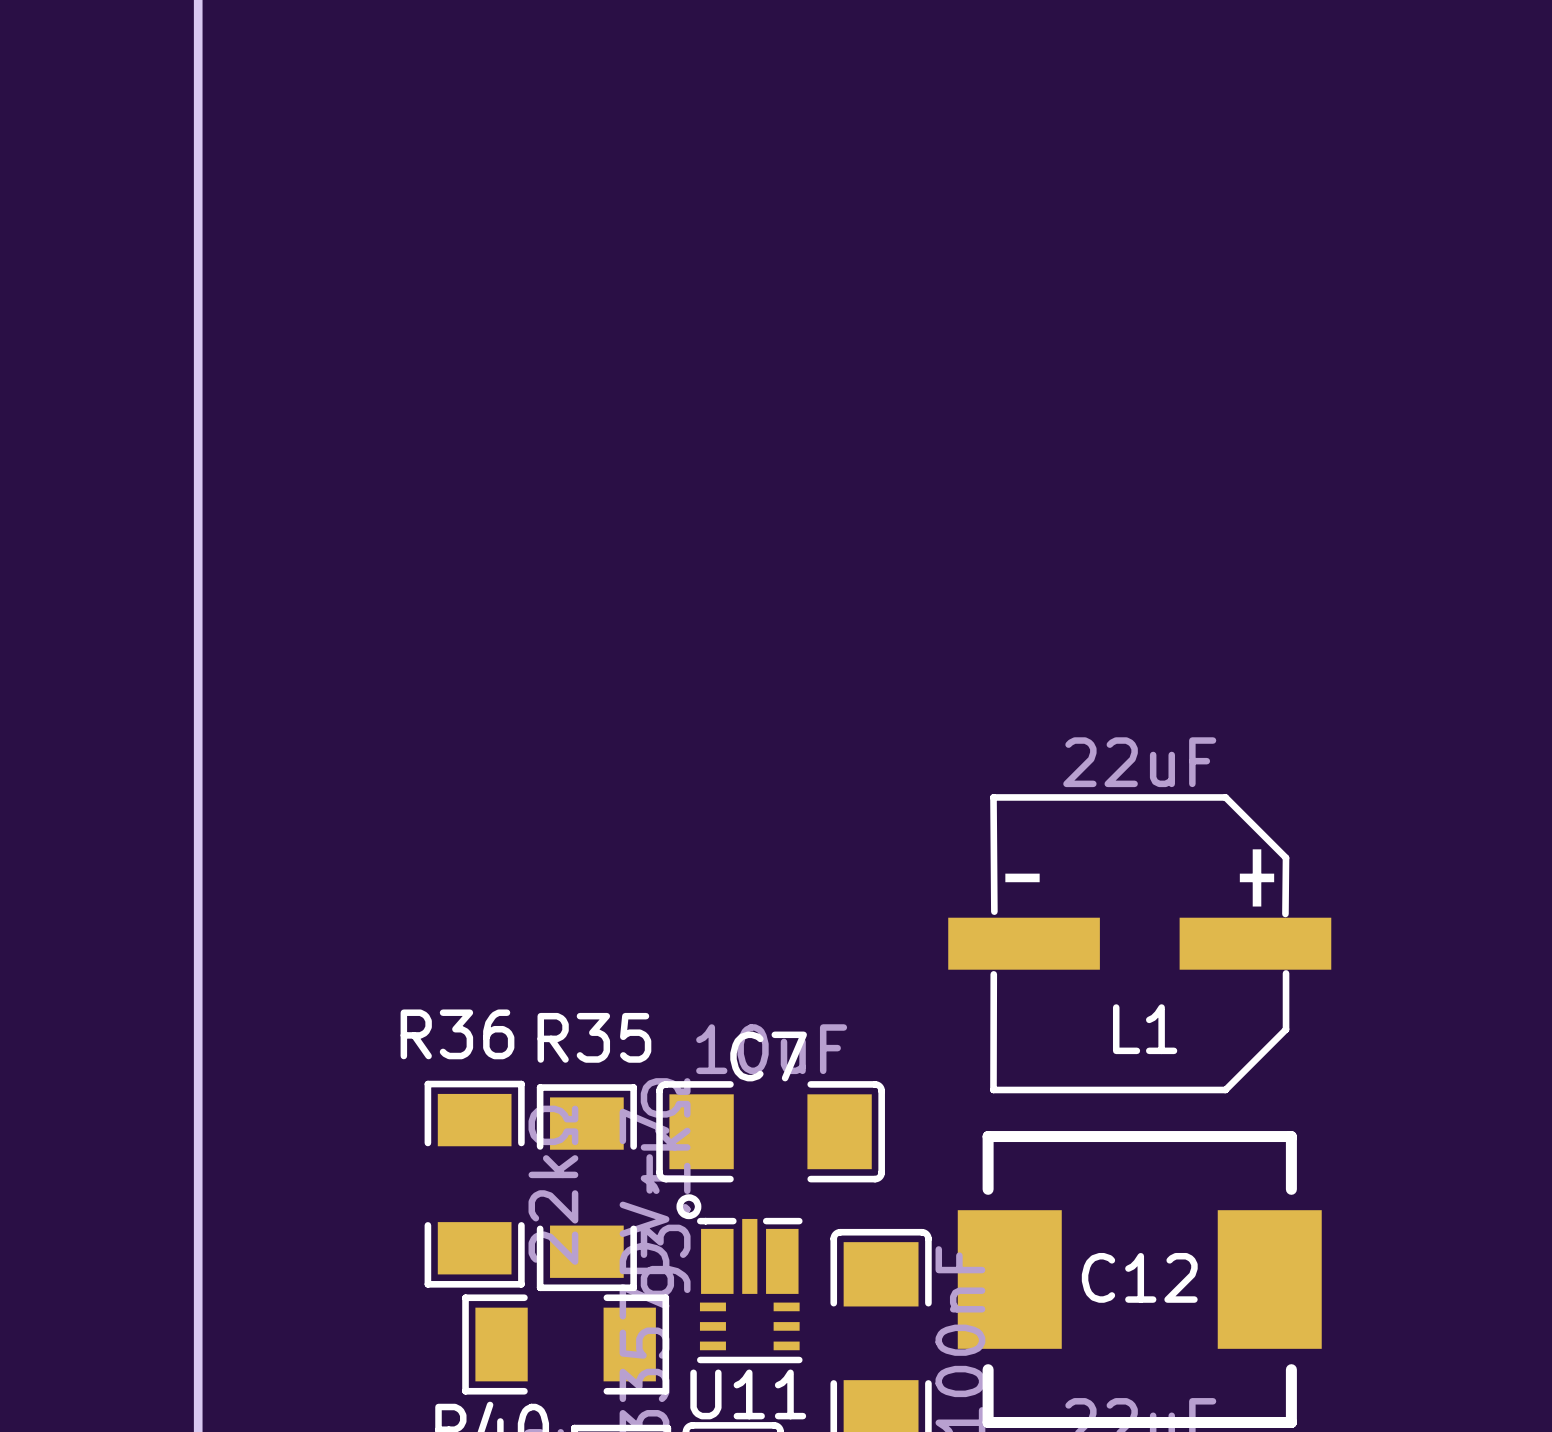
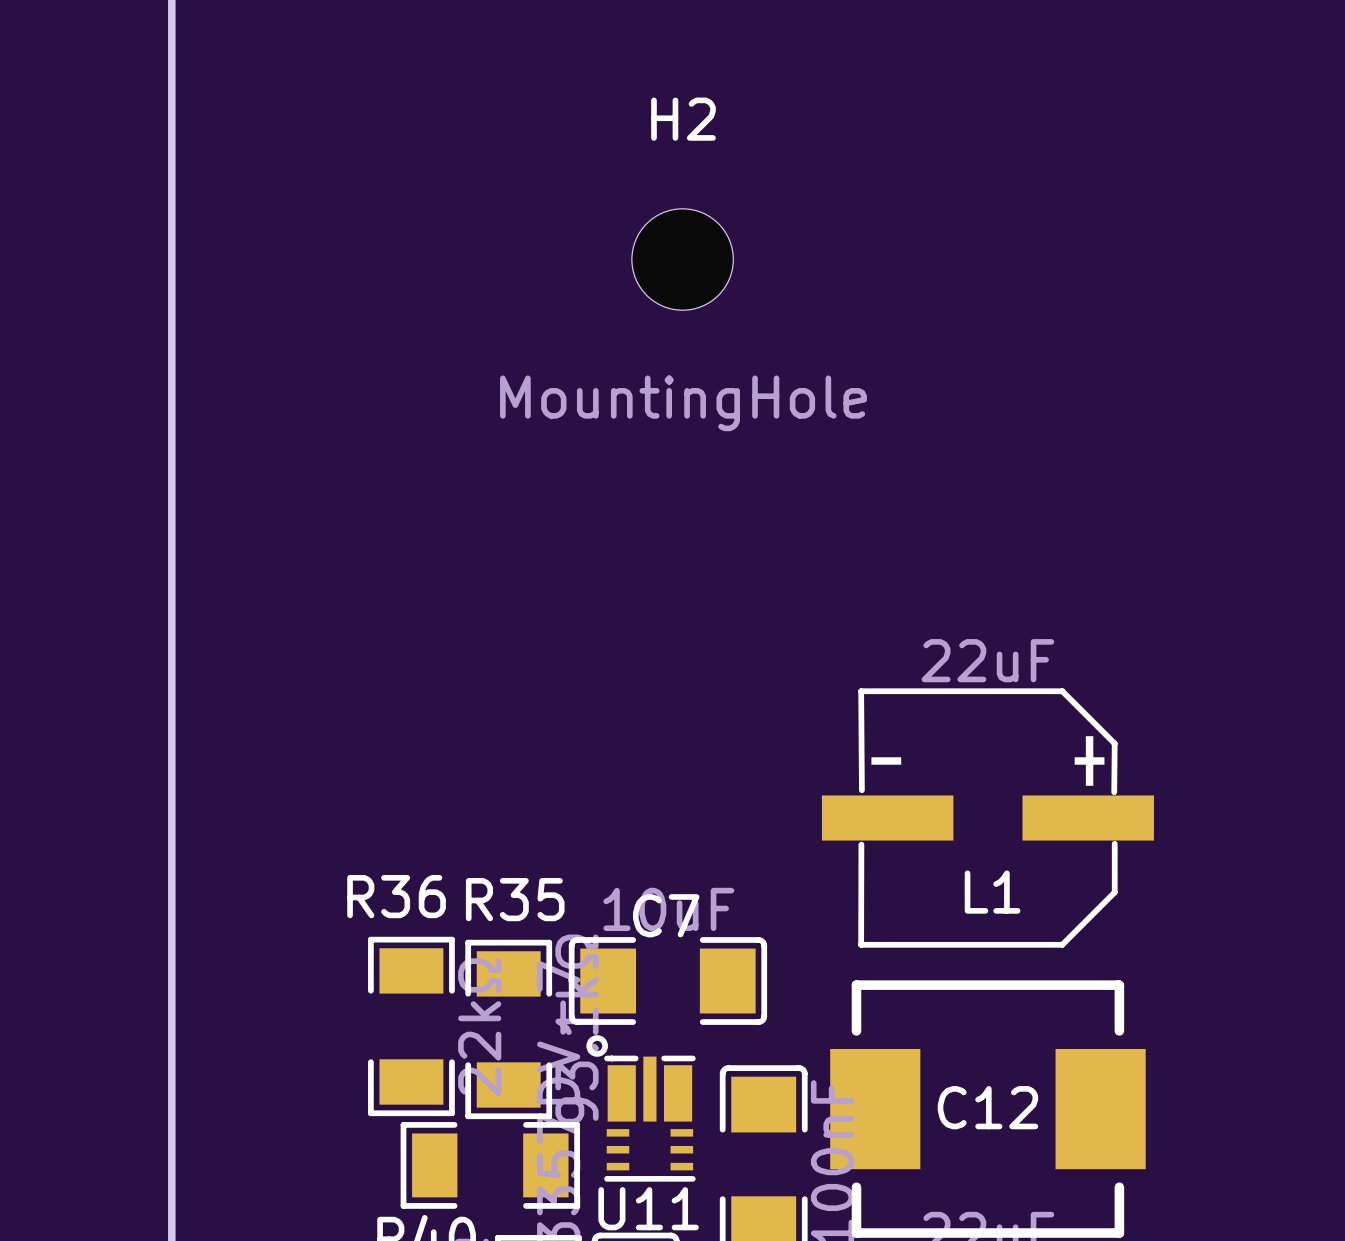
H2: none -> MountingHole (682, 259)

